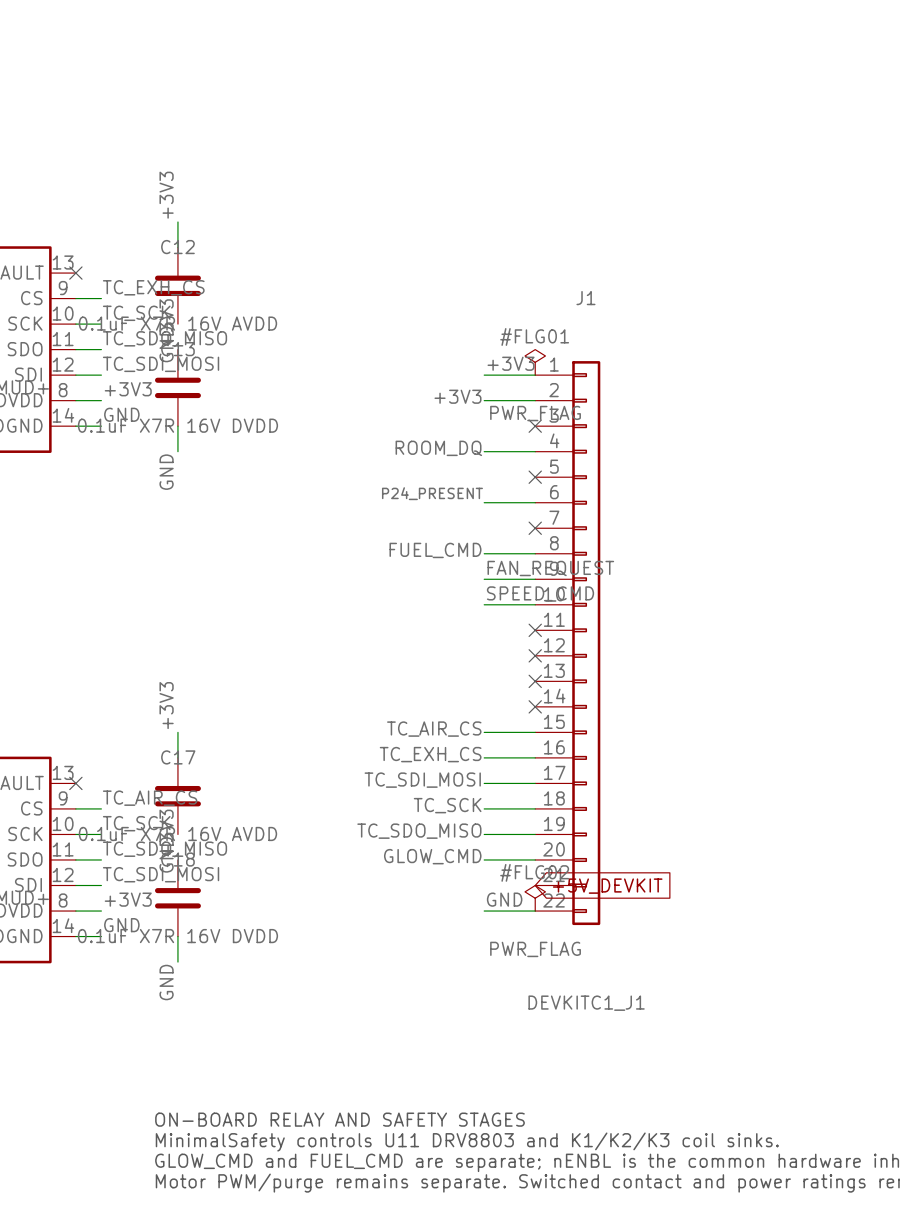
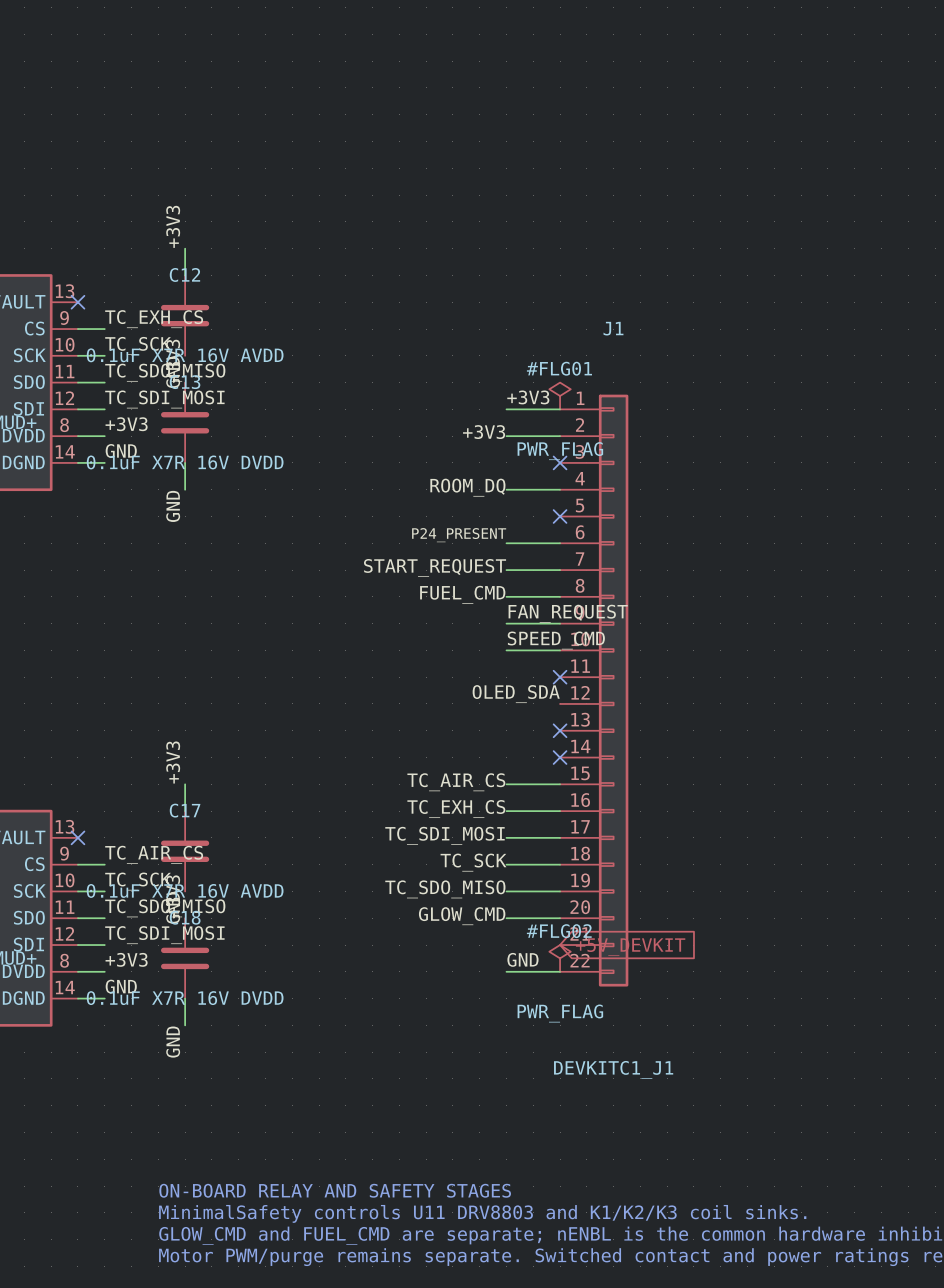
label: none -> START_REQUEST (435, 568)
wire: none -> (506, 570) (560, 570)
no-connect mark: (535, 528) -> none
label: none -> OLED_SDA (516, 694)
no-connect mark: (535, 655) -> none

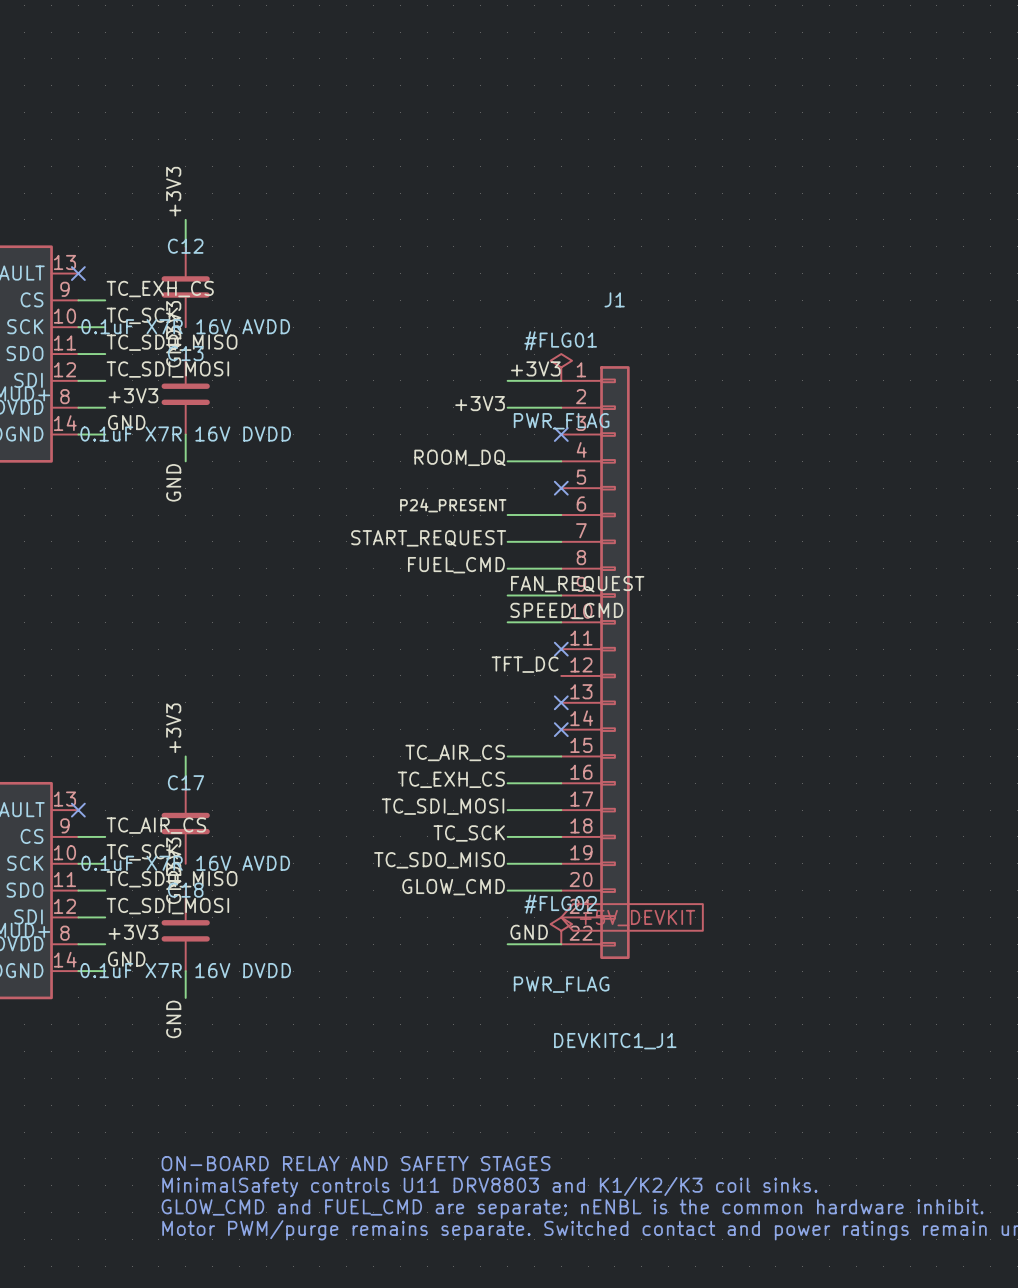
label: OLED_SDA (516, 694) -> TFT_DC (525, 664)

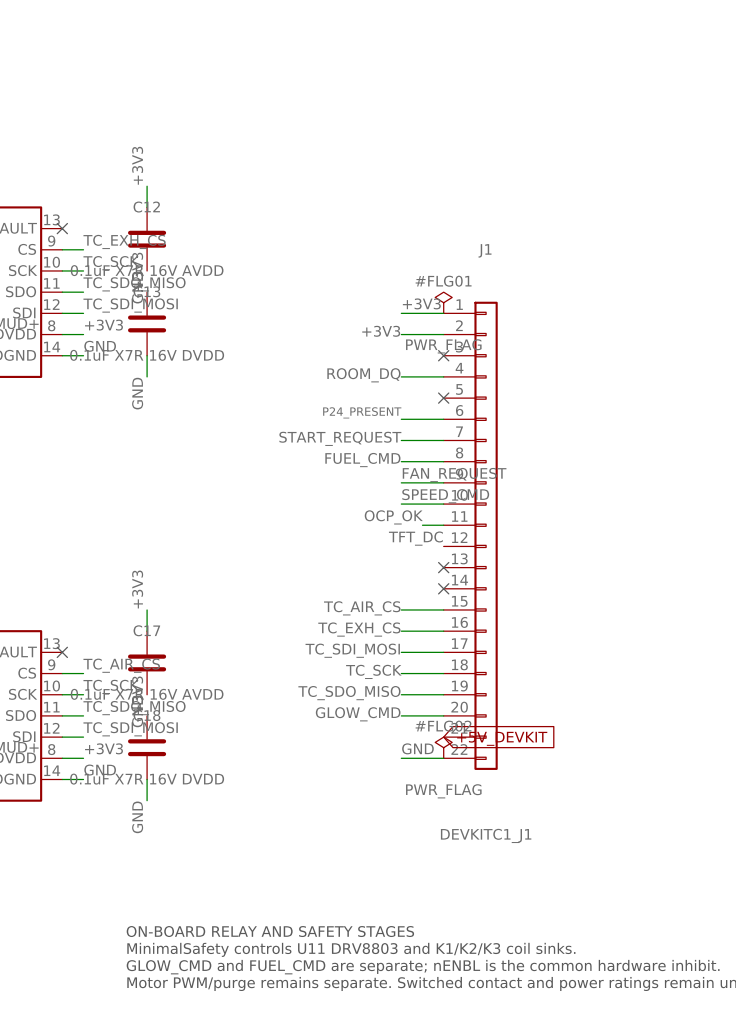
label: none -> OCP_OK (393, 517)
wire: none -> (422, 525) (443, 525)
no-connect mark: (561, 649) -> none

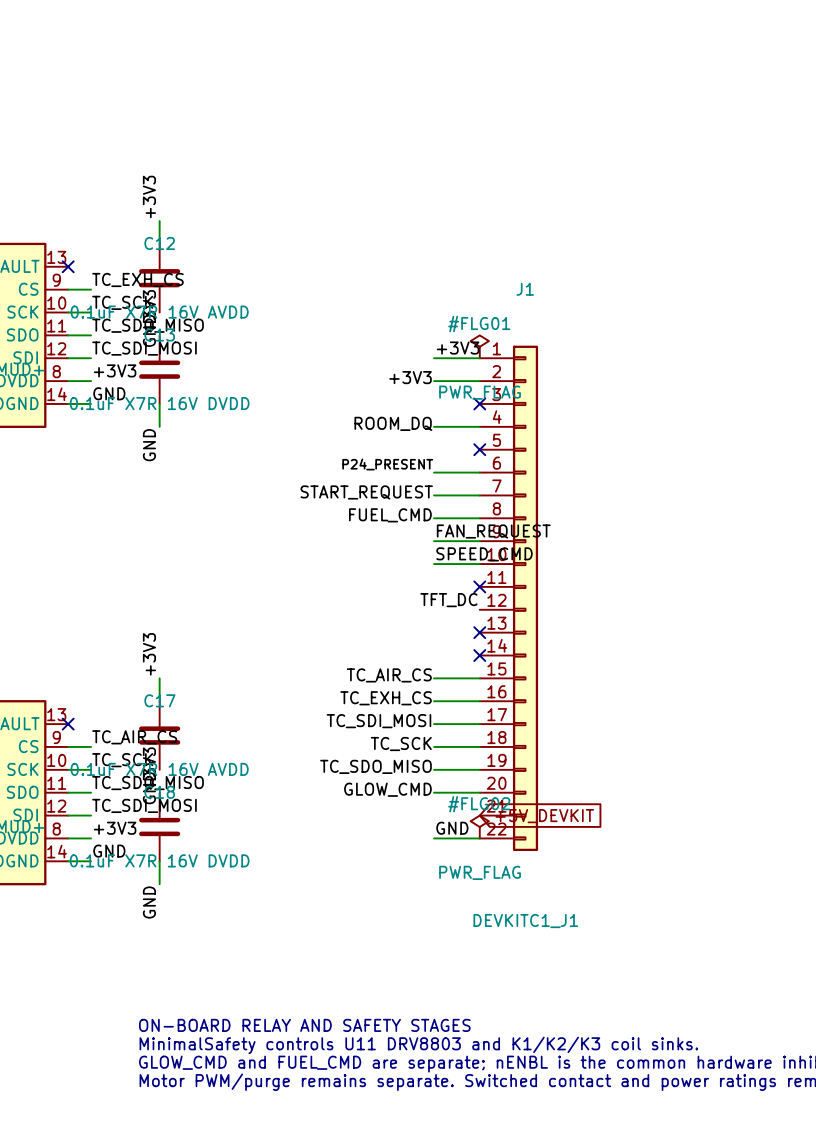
label: OCP_OK (393, 517) -> none
wire: (422, 525) (443, 525) -> none
no-connect mark: none -> (479, 586)

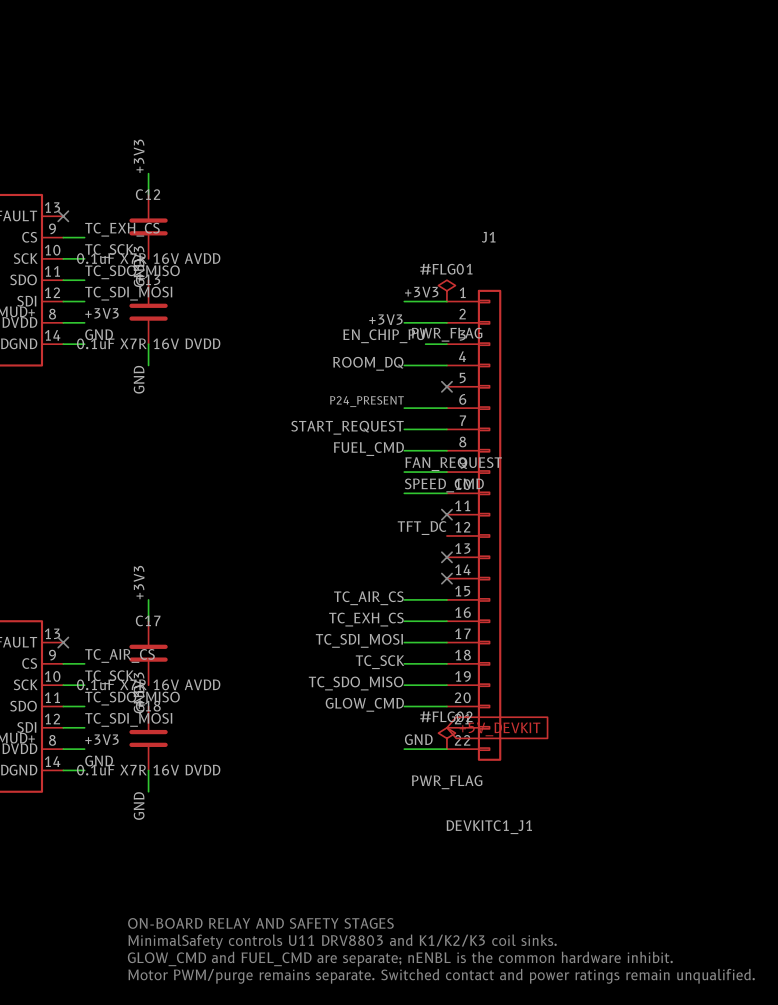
label: none -> EN_CHIP_PU (383, 336)
wire: none -> (425, 344) (446, 344)
no-connect mark: (479, 403) -> none

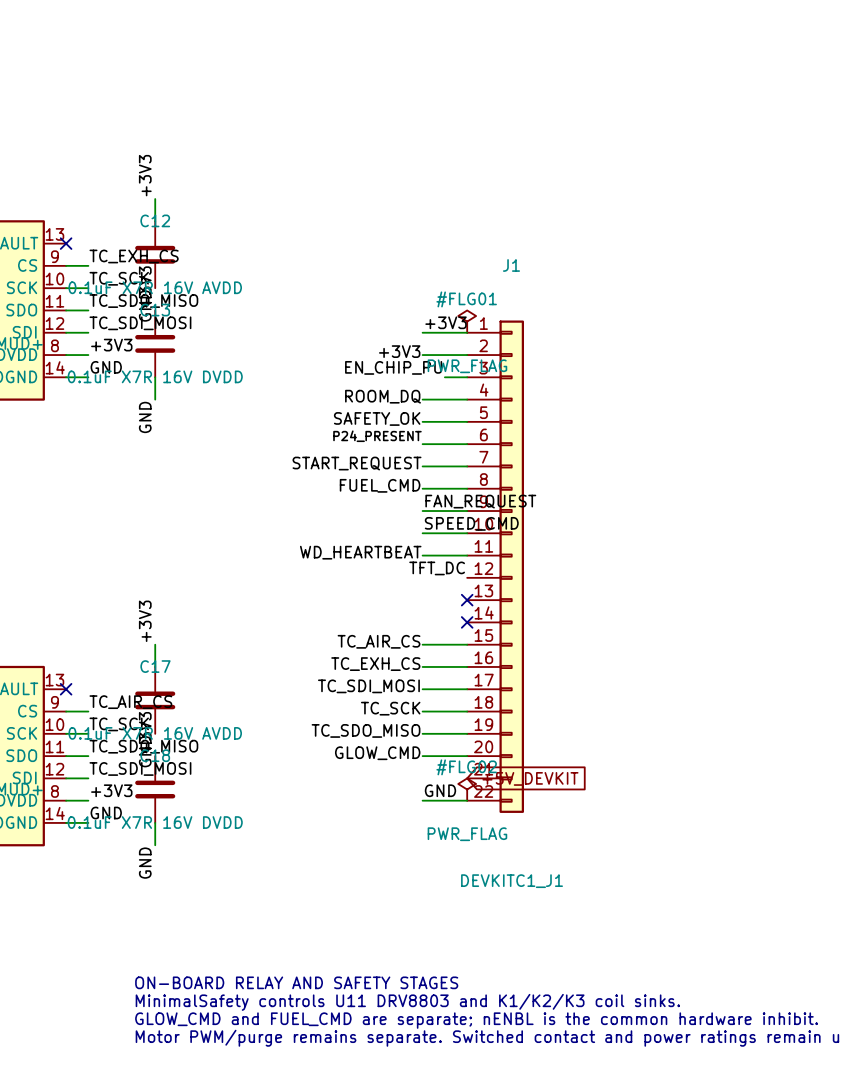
label: none -> SAFETY_OK (377, 418)
wire: none -> (422, 421) (467, 421)
no-connect mark: (446, 386) -> none
label: none -> WD_HEARTBEAT (360, 552)
wire: none -> (422, 555) (467, 555)
no-connect mark: (446, 514) -> none

